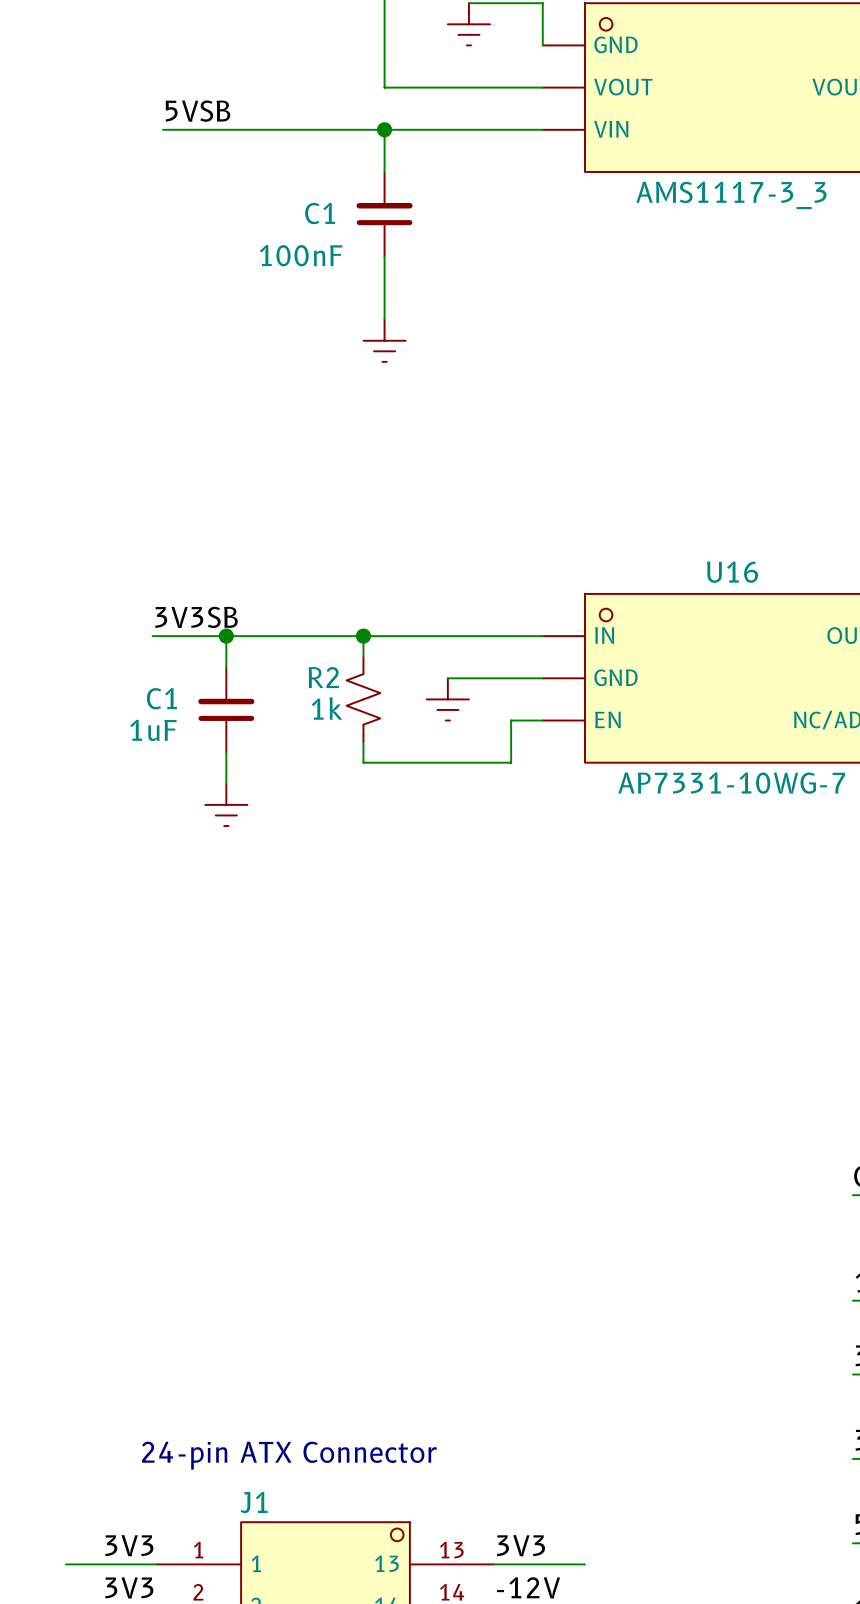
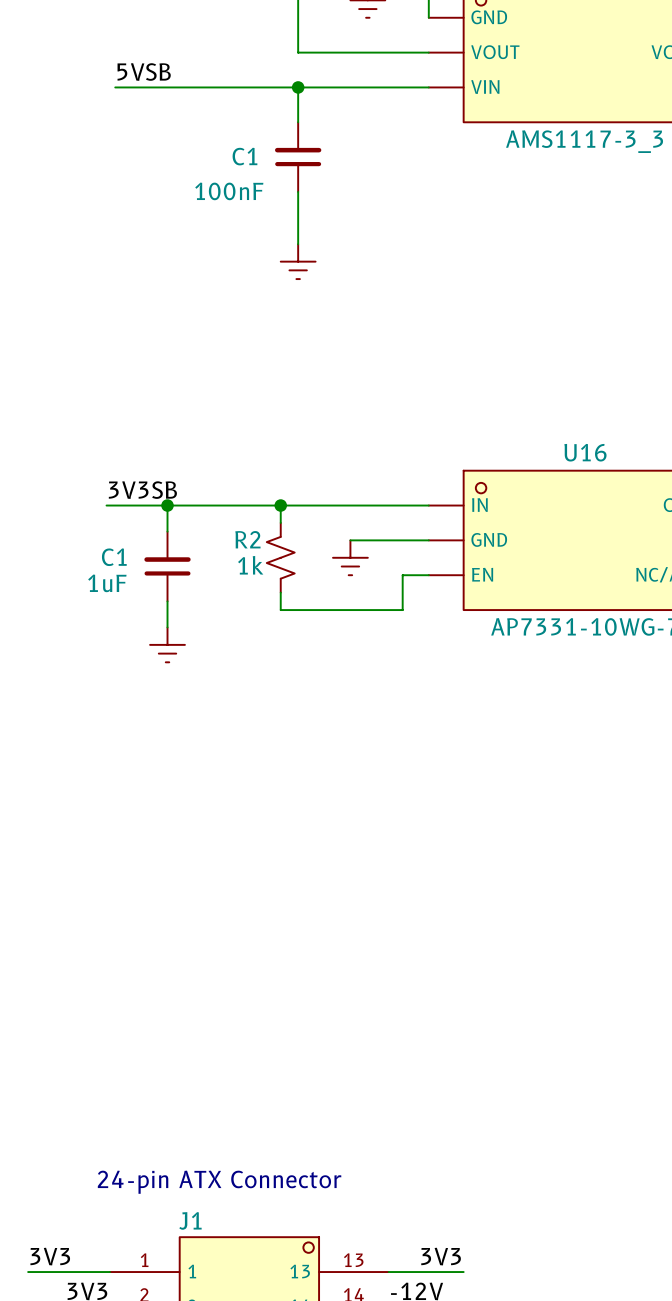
label position: 3V3 (129, 1545) -> 3V3 (50, 1256)
label position: 3V3 (521, 1545) -> 3V3 (441, 1256)
wire: none -> (28, 1272) (35, 1272)

